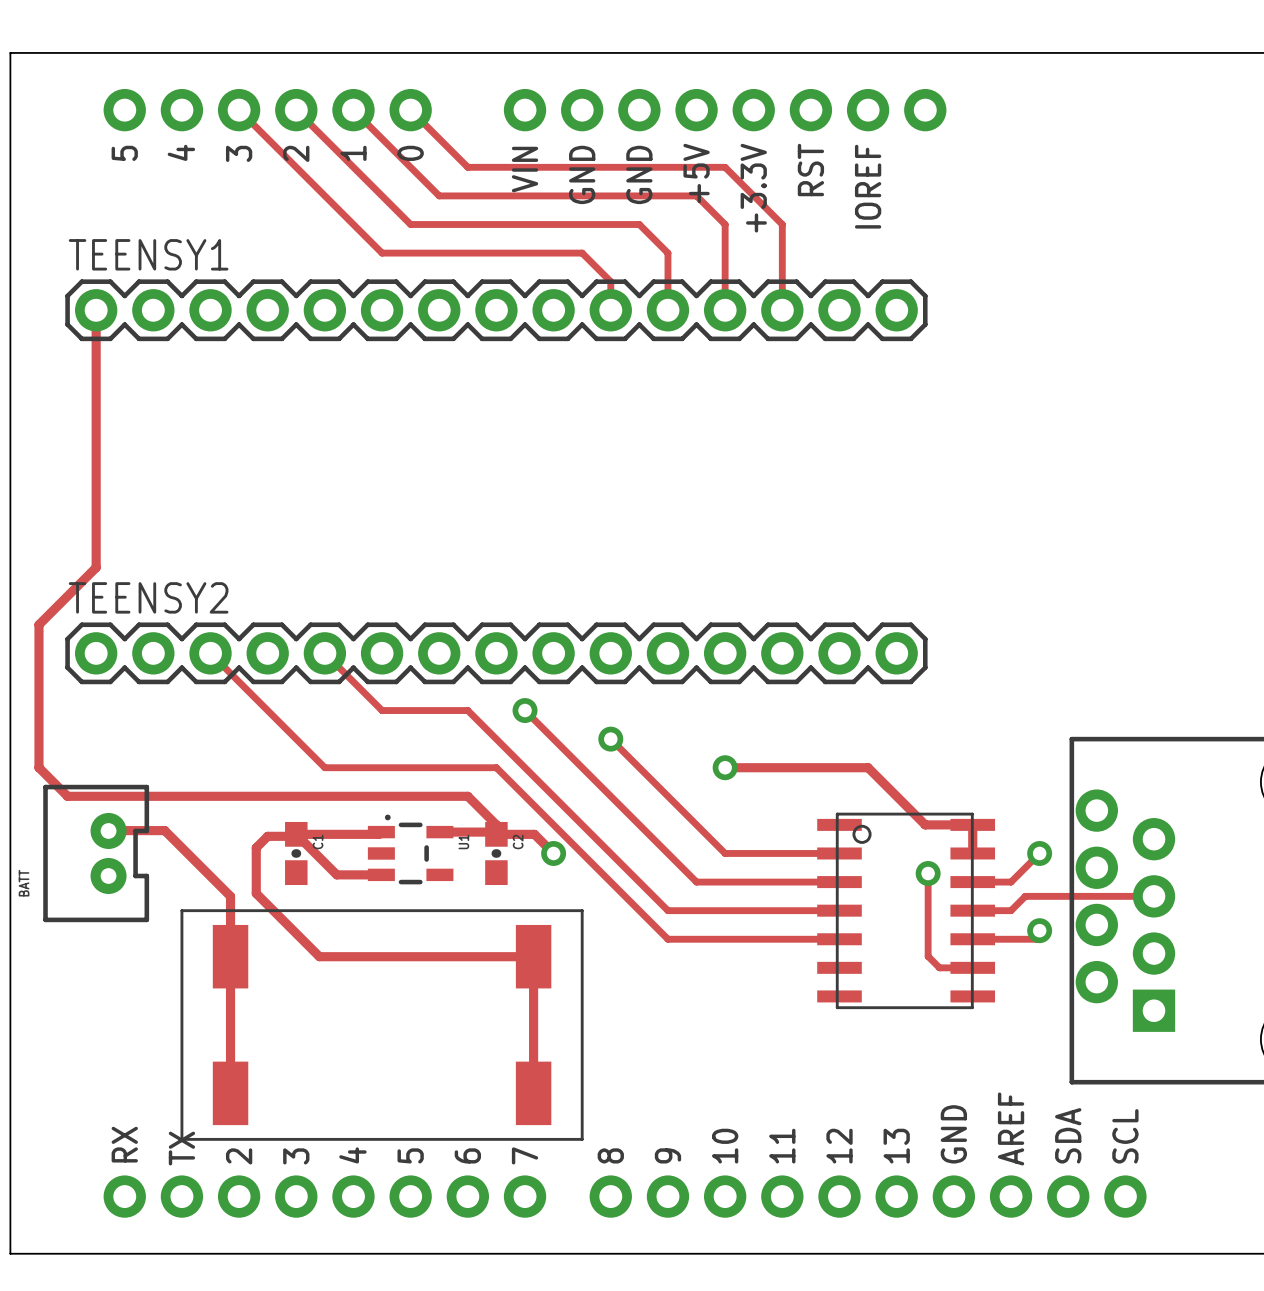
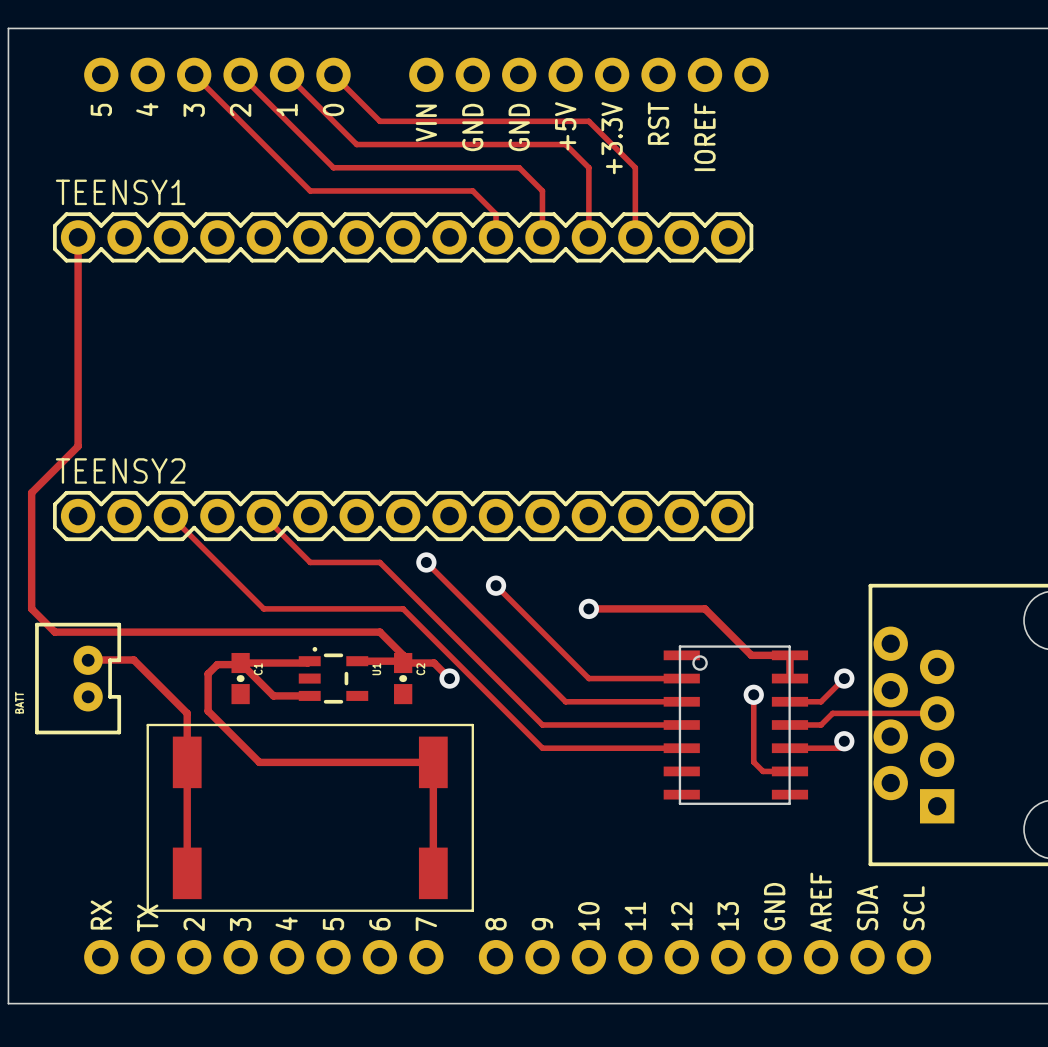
part footprint: [817, 812, 996, 1010] -> [663, 645, 809, 805]

